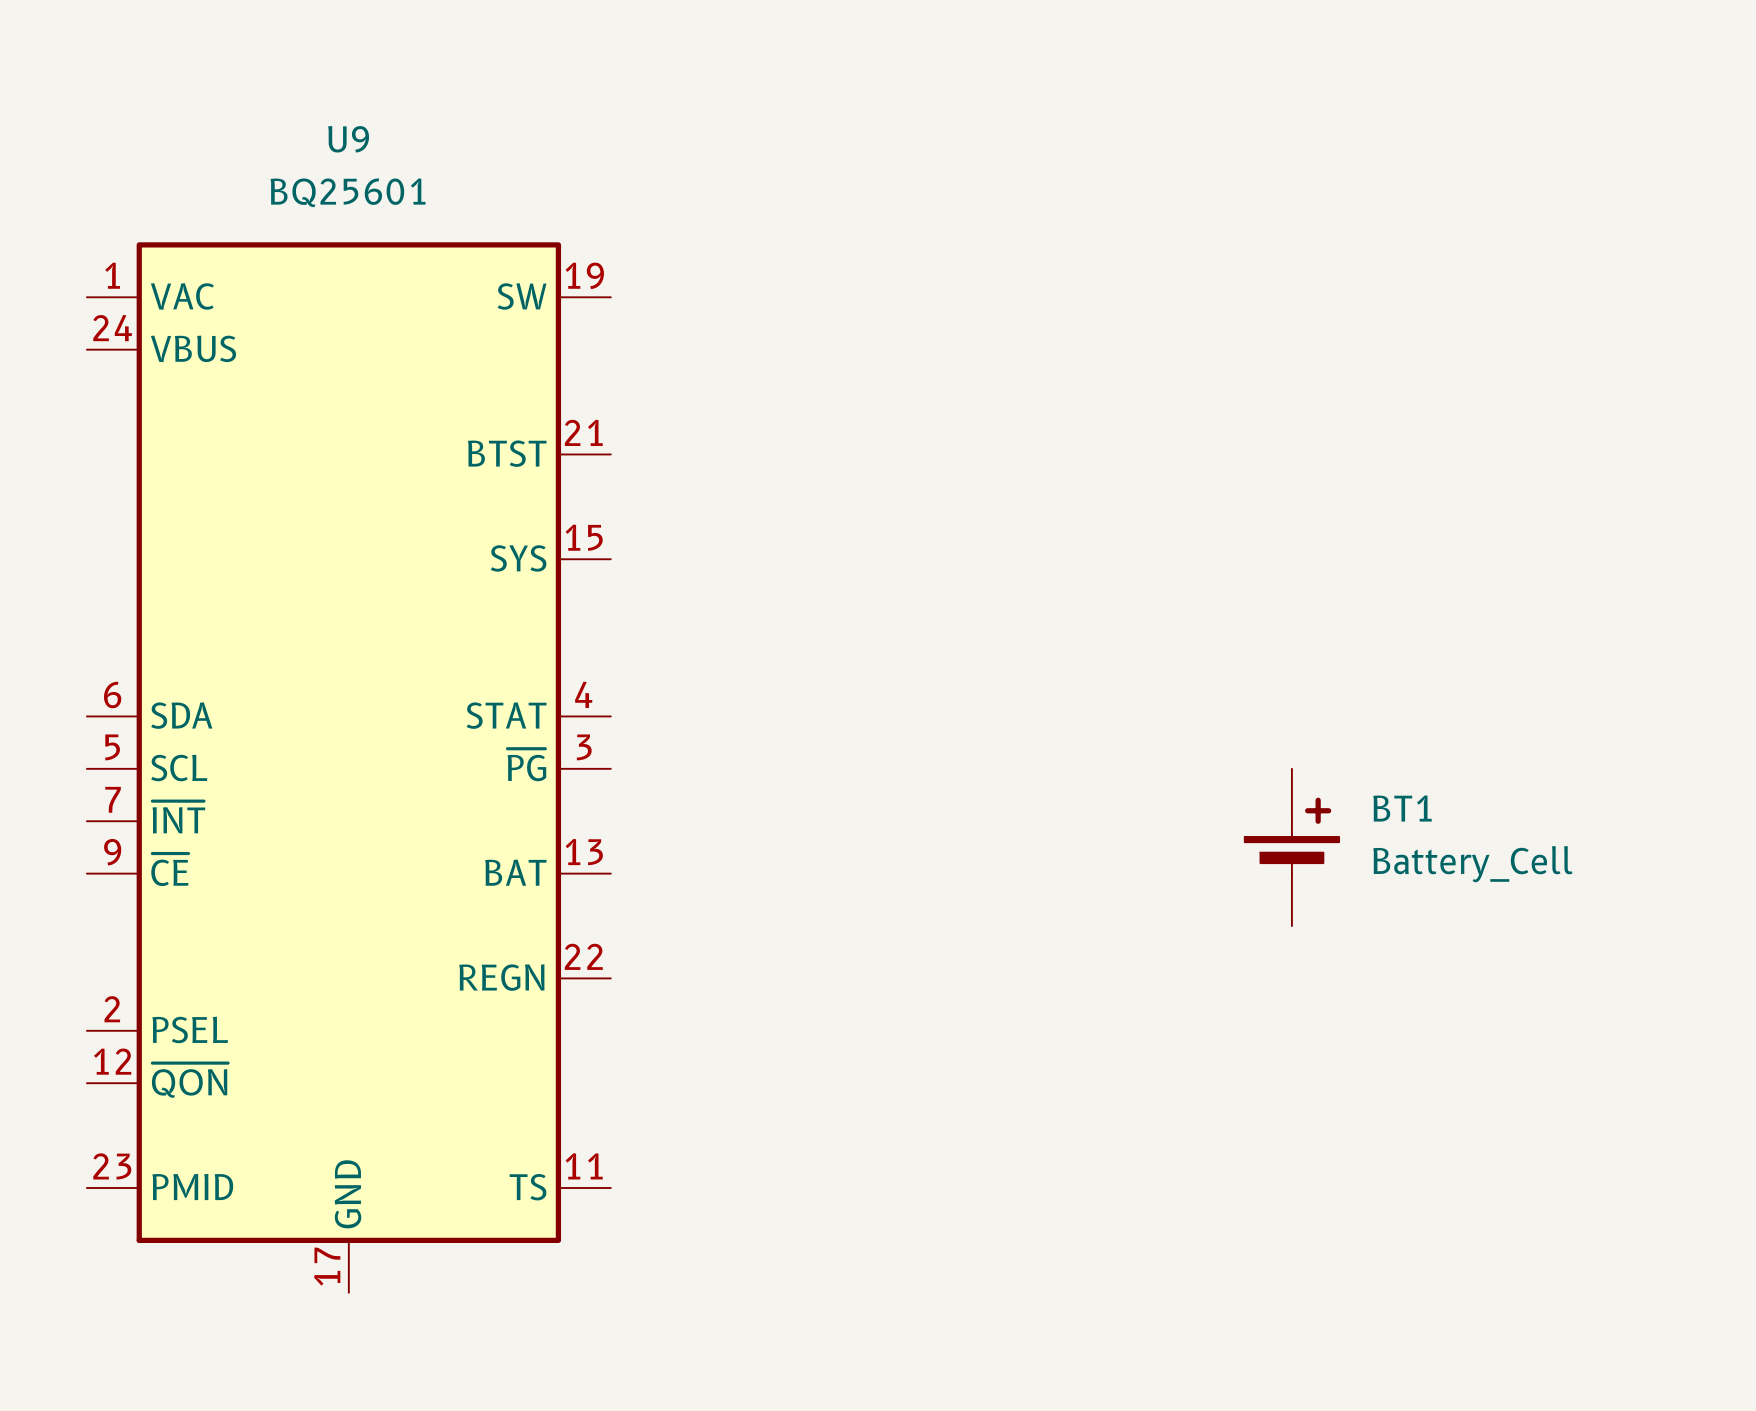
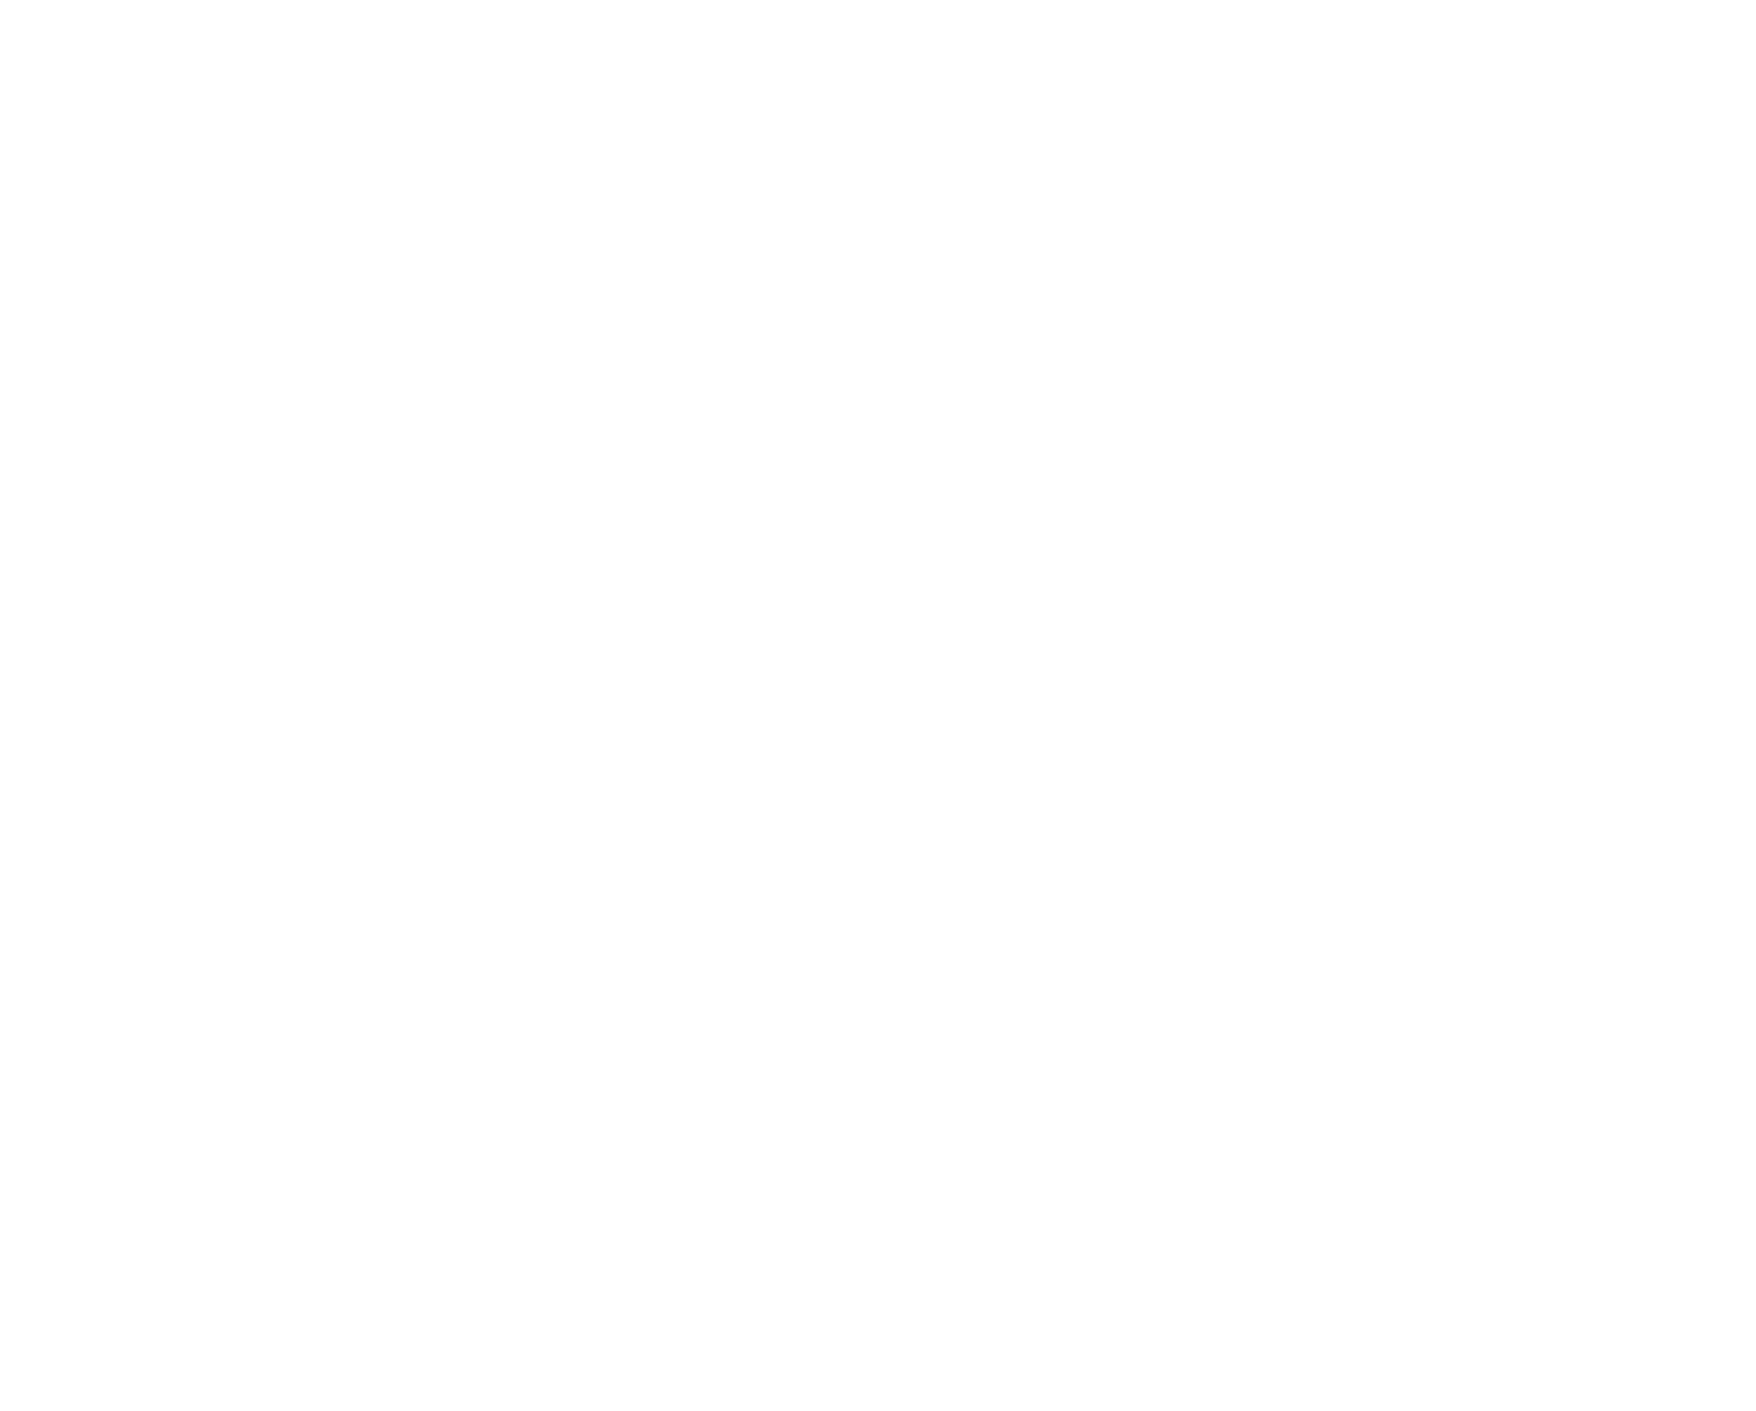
U9: BQ25601 (348, 767) -> none
BT1: Battery_Cell (1291, 847) -> none

